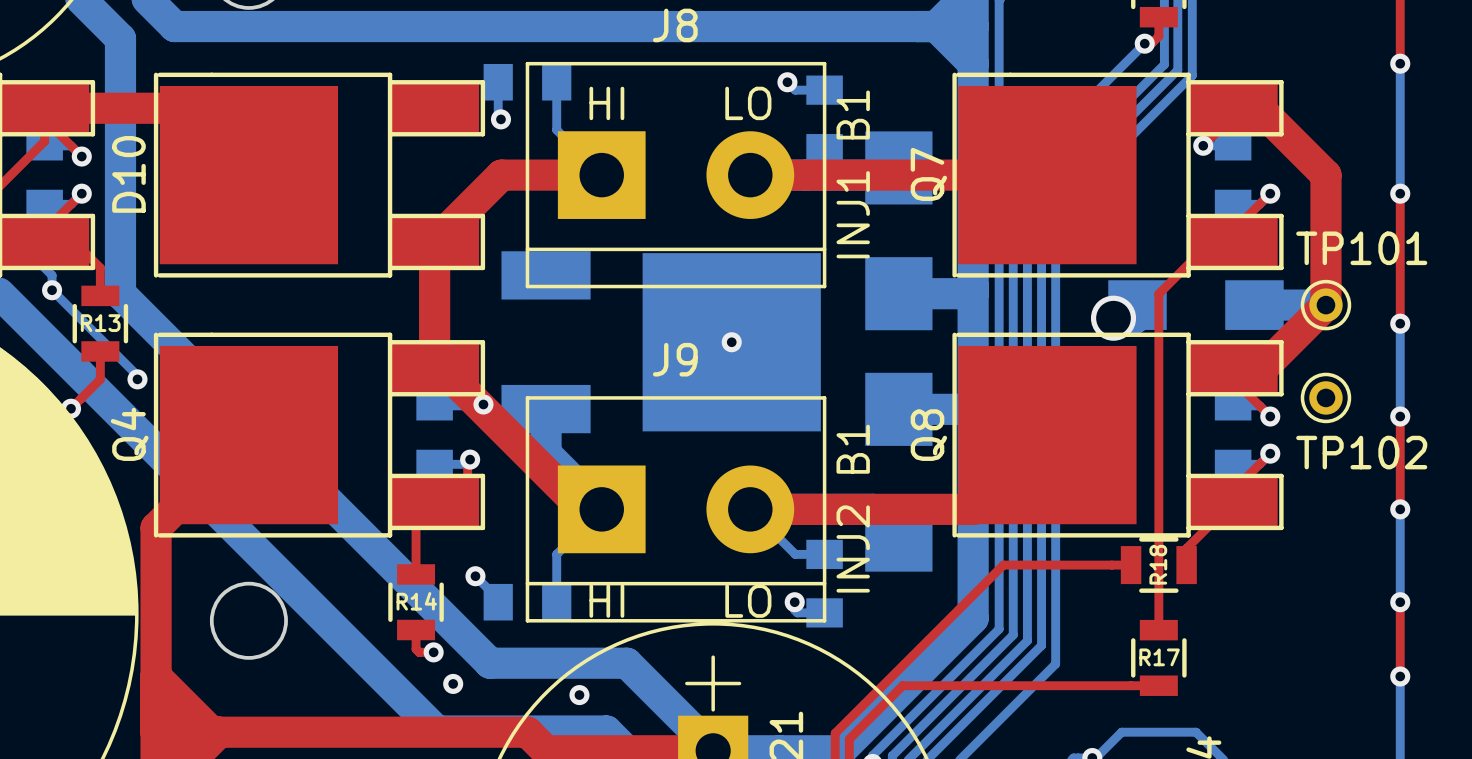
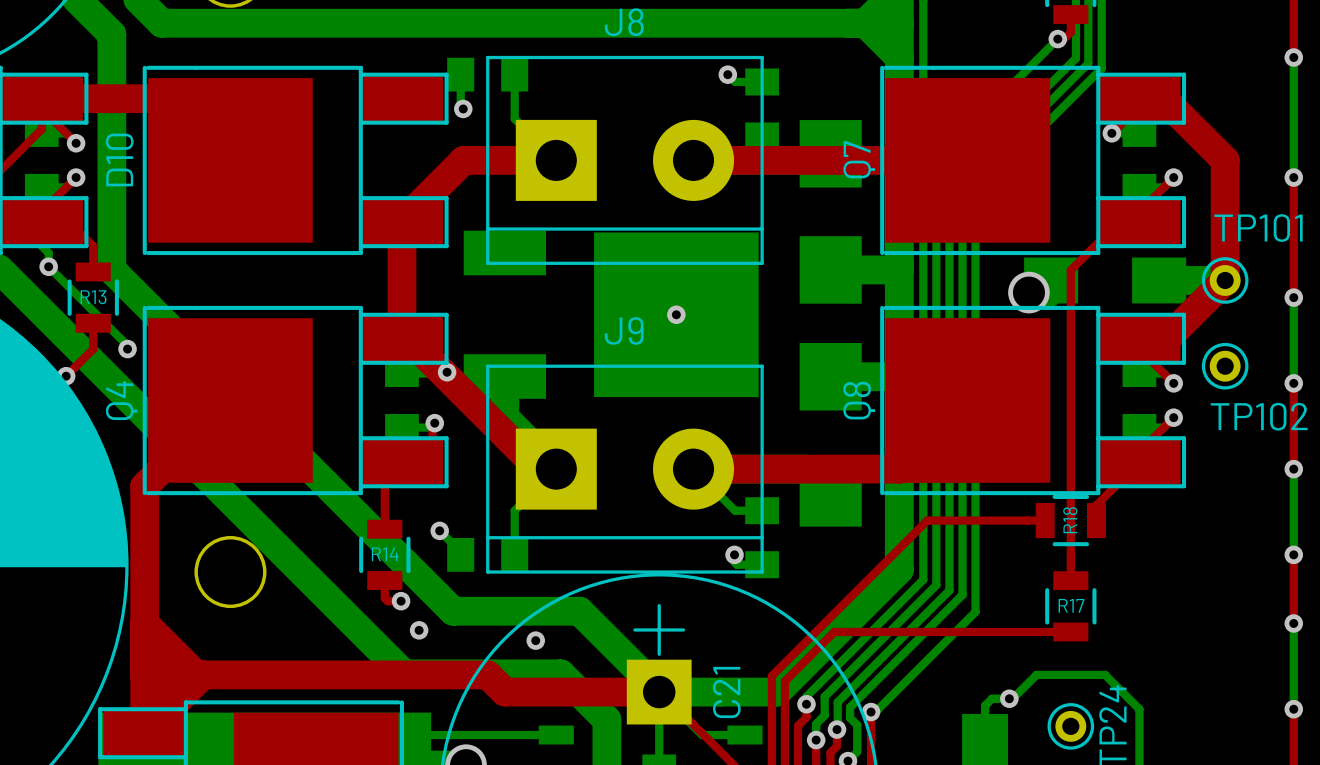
text: HI LO (680, 103) -> none
text: INJ1 B1 (853, 174) -> none
text: INJ2 B1 (853, 508) -> none
text: HI LO (680, 601) -> none

